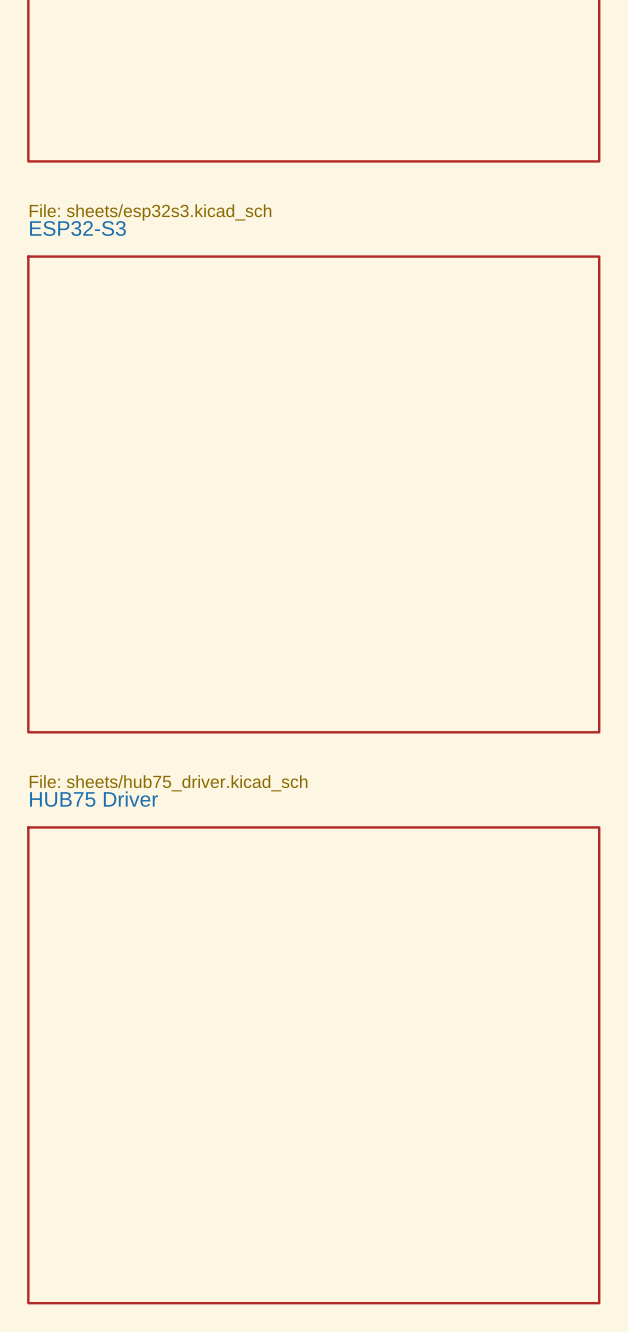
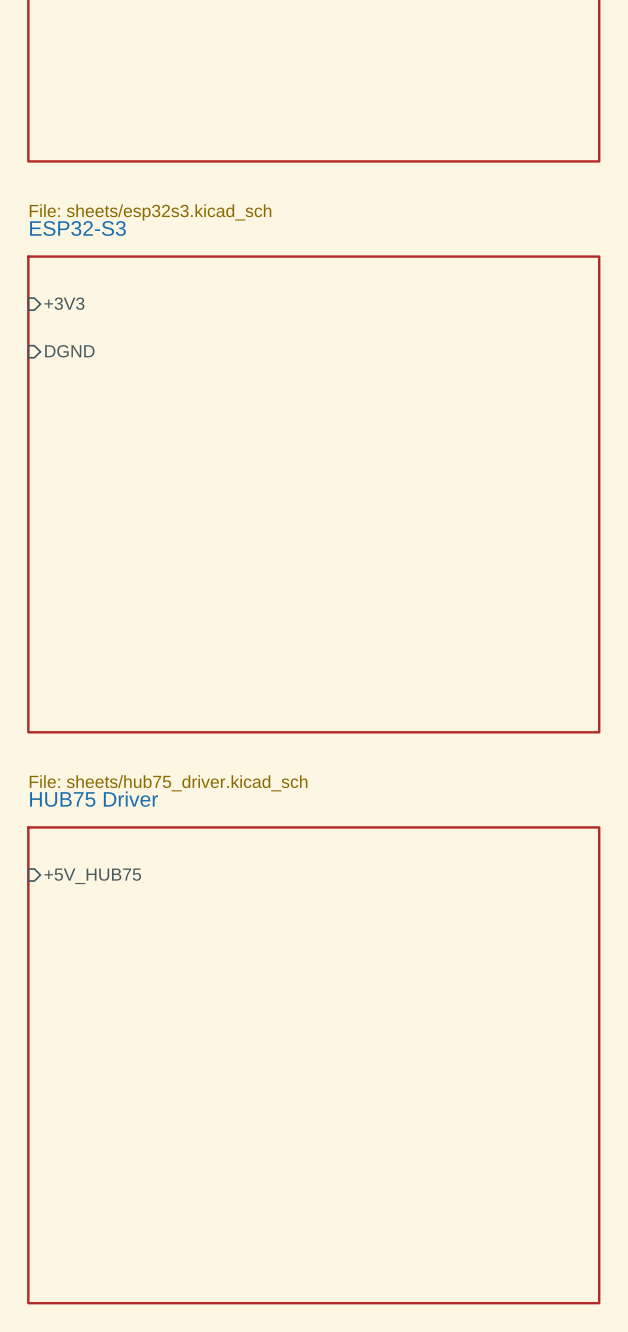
sheet pin: none -> +3V3 (64, 303)
sheet pin: none -> DGND (69, 351)
sheet pin: none -> +5V_HUB75 (92, 876)

